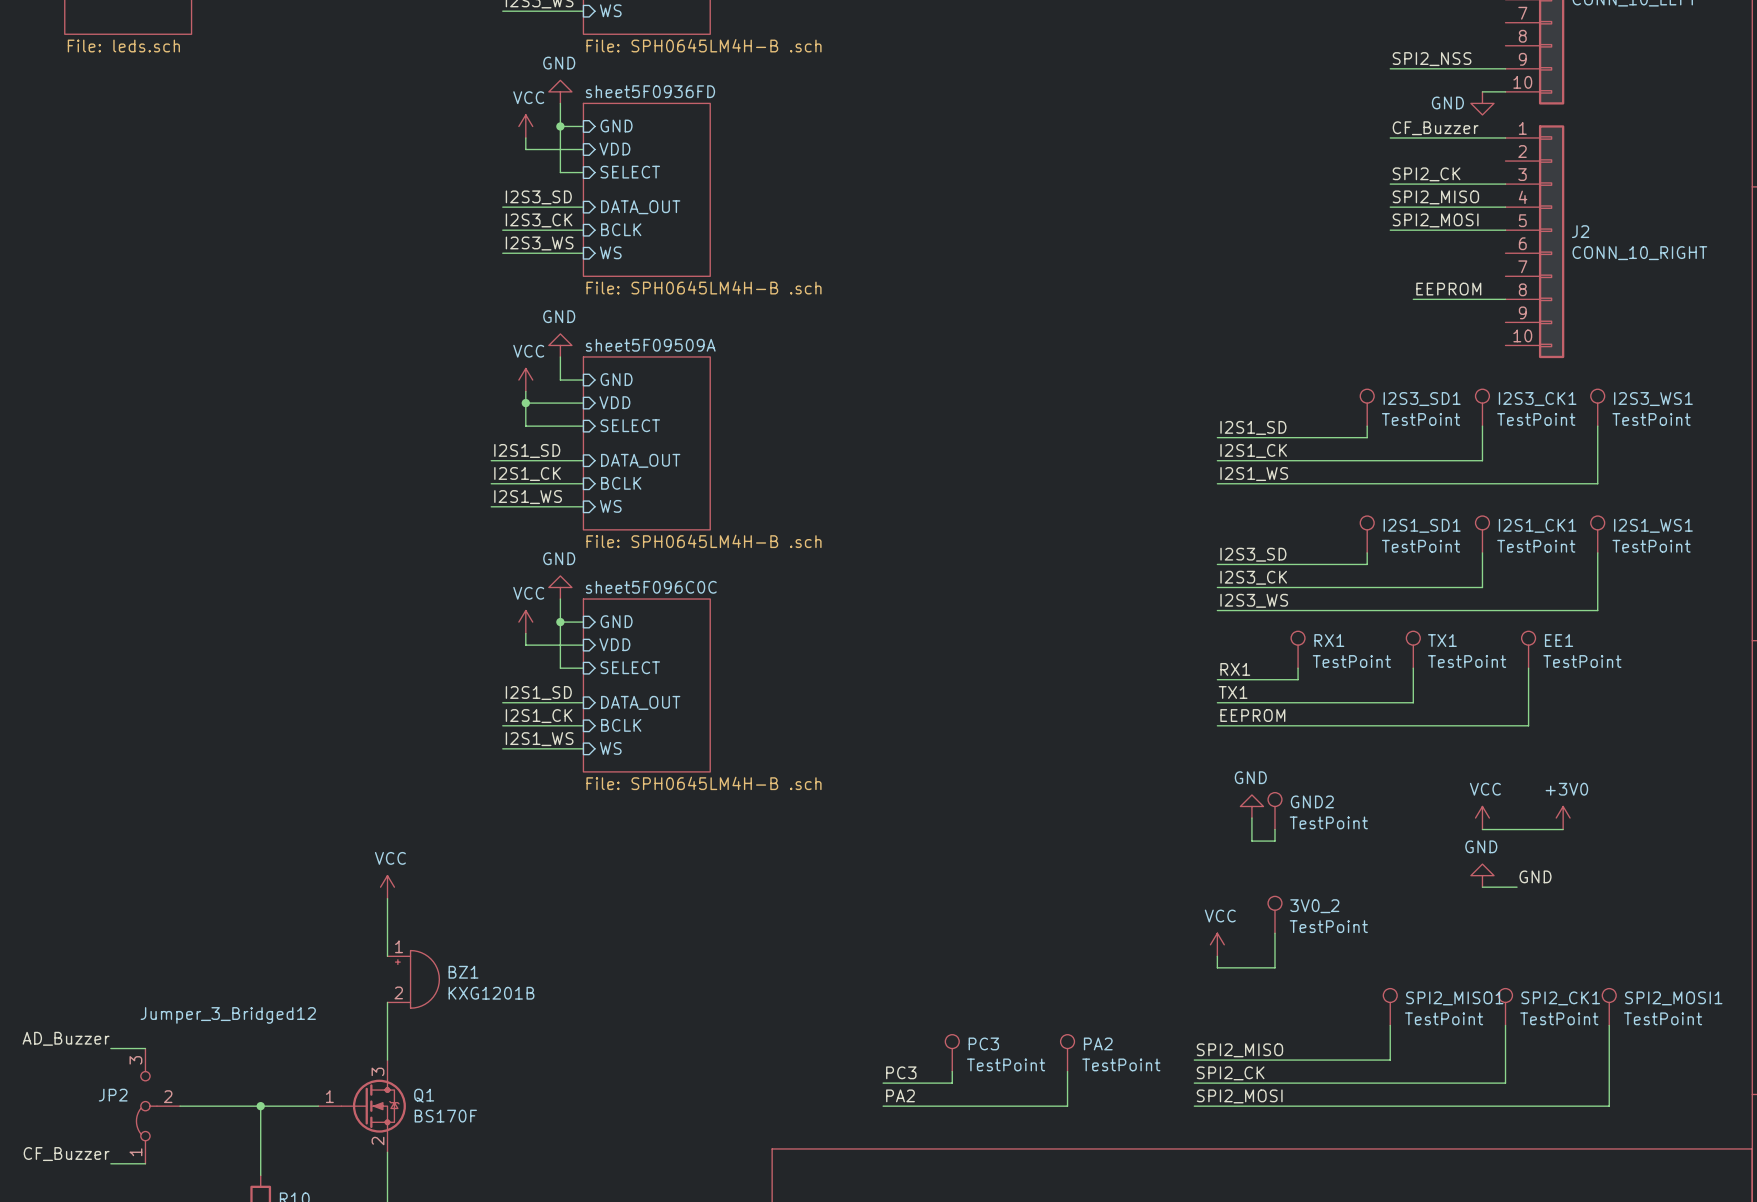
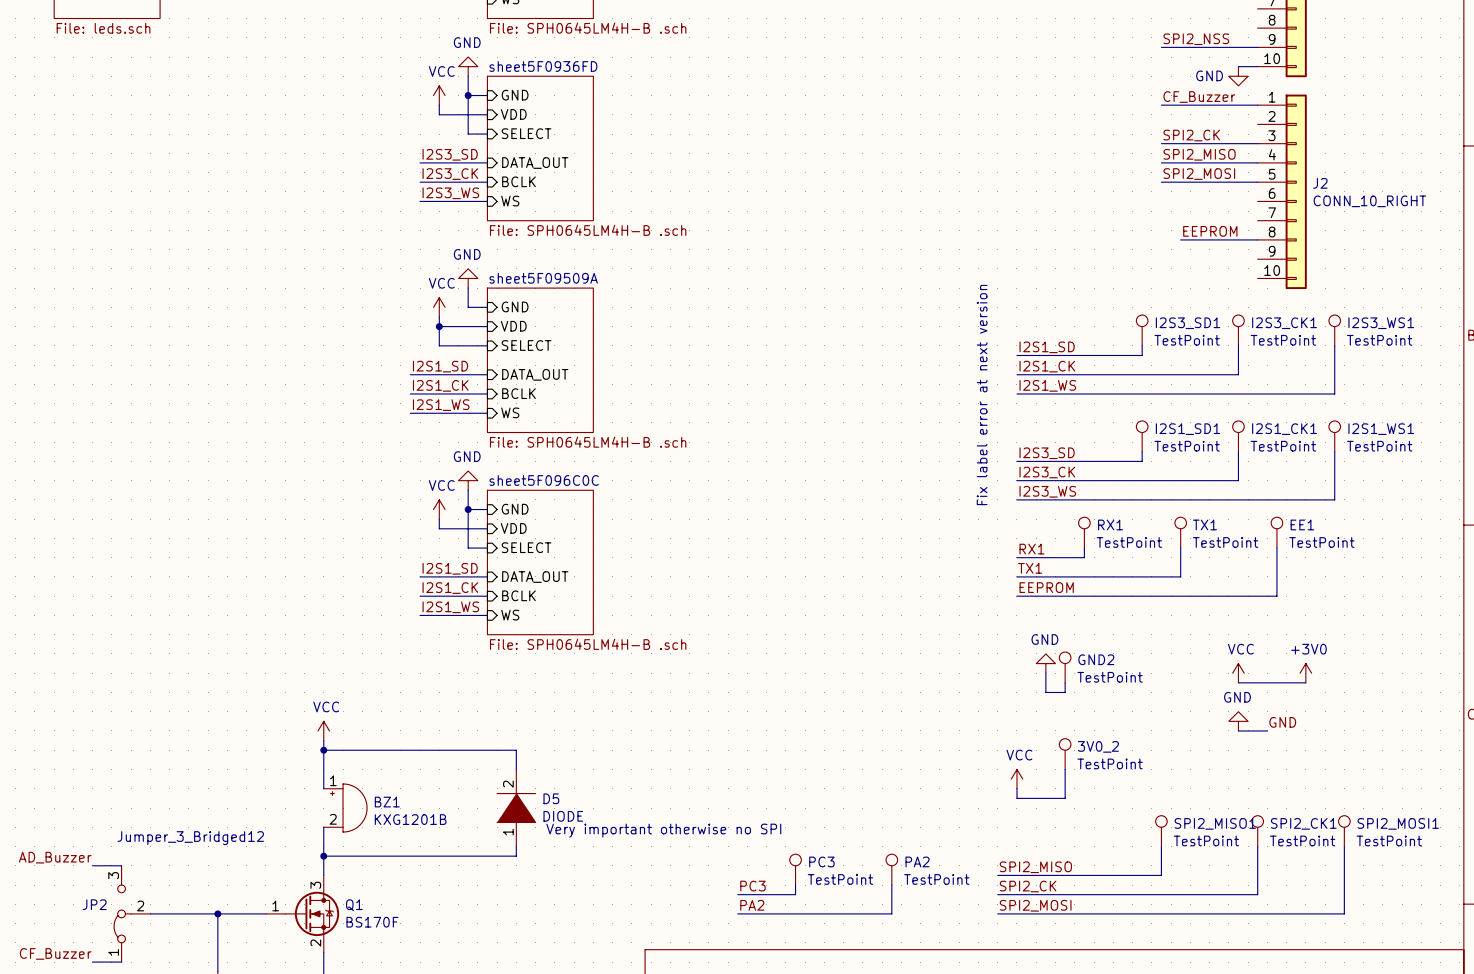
text: none -> Fix label error at next version (982, 395)
wire: none -> (323, 750) (516, 750) (516, 769)
junction: none -> (323, 750)
D5: none -> DIODE (516, 808)
text: none -> Very important otherwise no SPI (663, 830)
wire: none -> (516, 846) (516, 856) (323, 856)
junction: none -> (323, 856)

